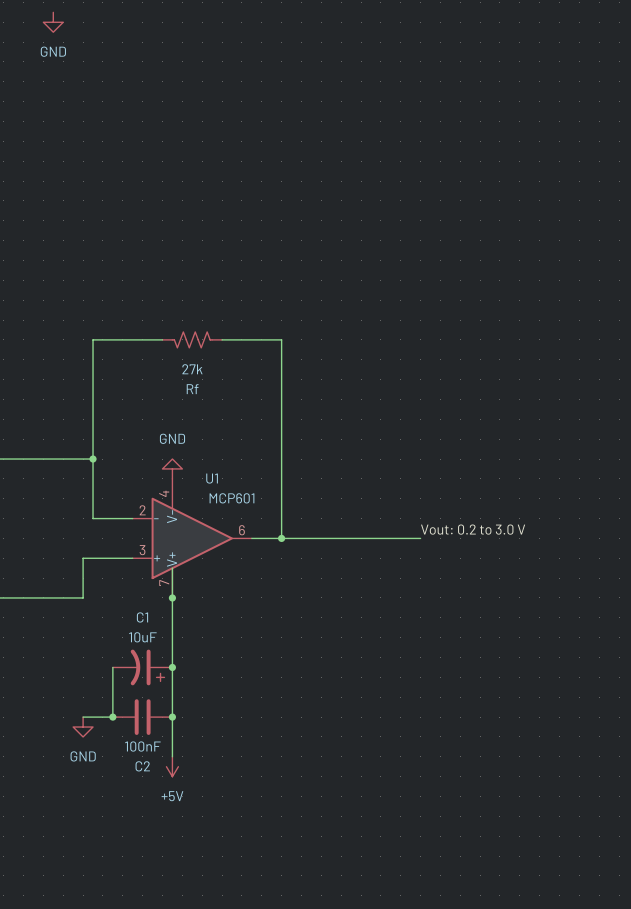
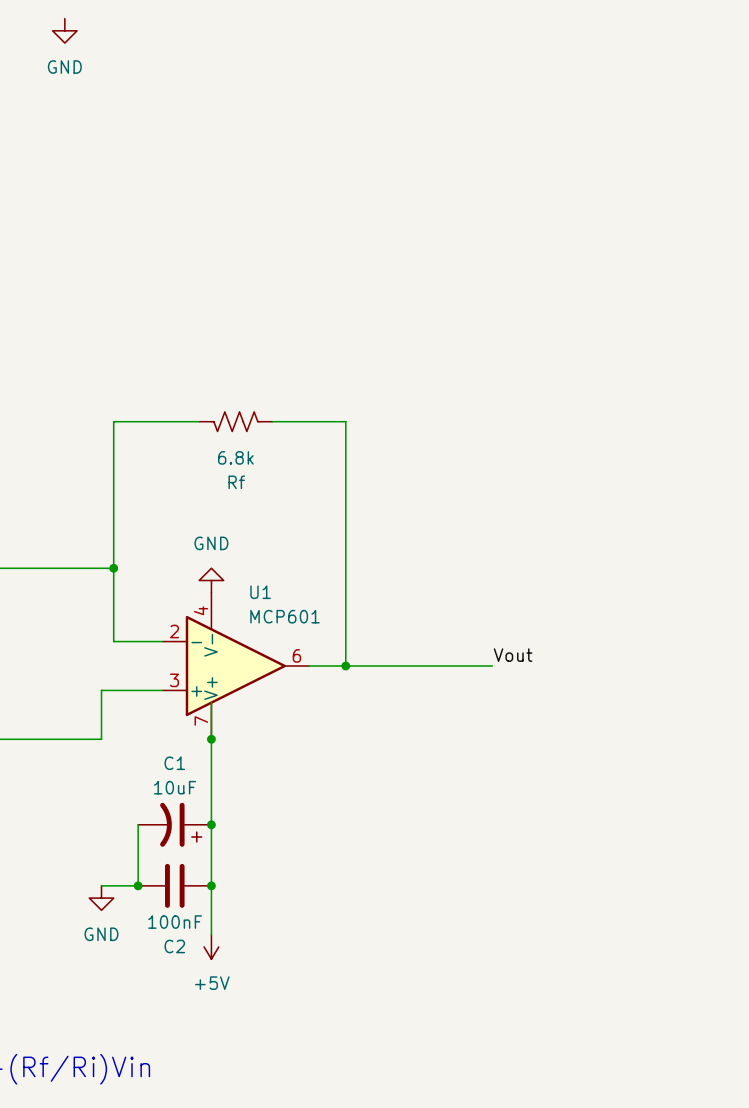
Rf value: 27k (192, 369) -> 6.8k (235, 457)
label: none -> Vout (513, 655)
label: Vout: 0.2 to 3.0 V (473, 529) -> none
wire: (400, 538) (420, 538) -> none

